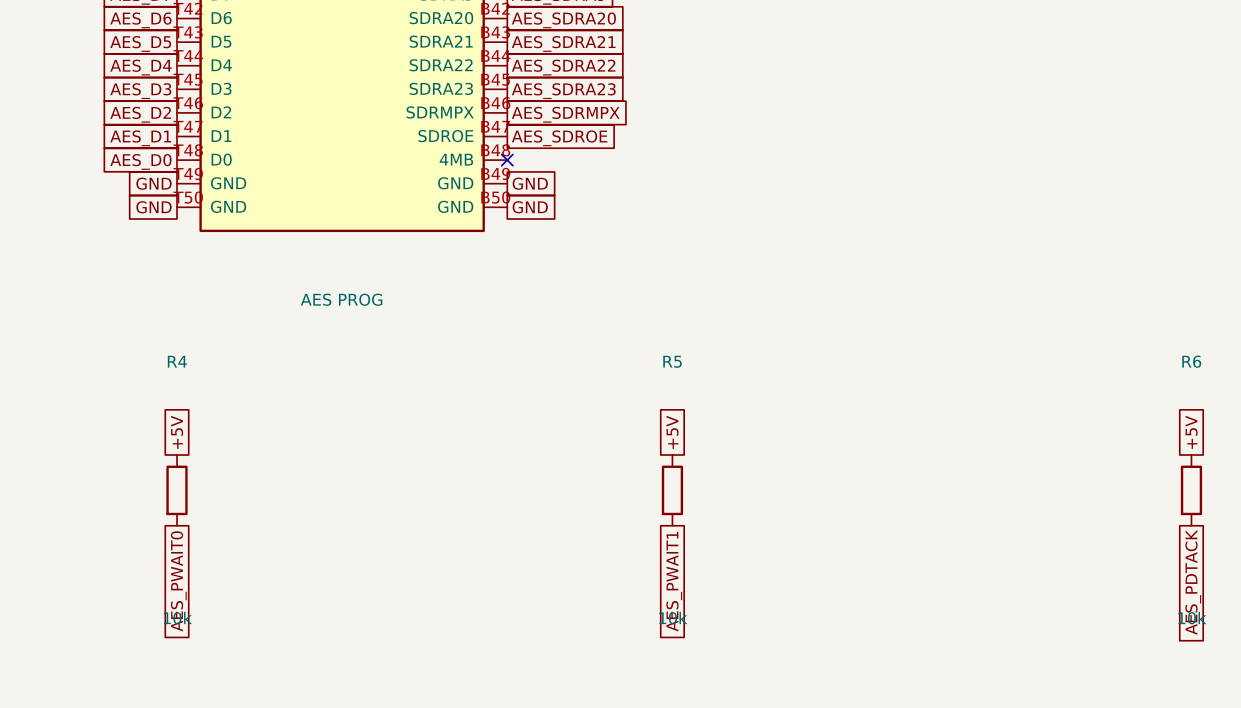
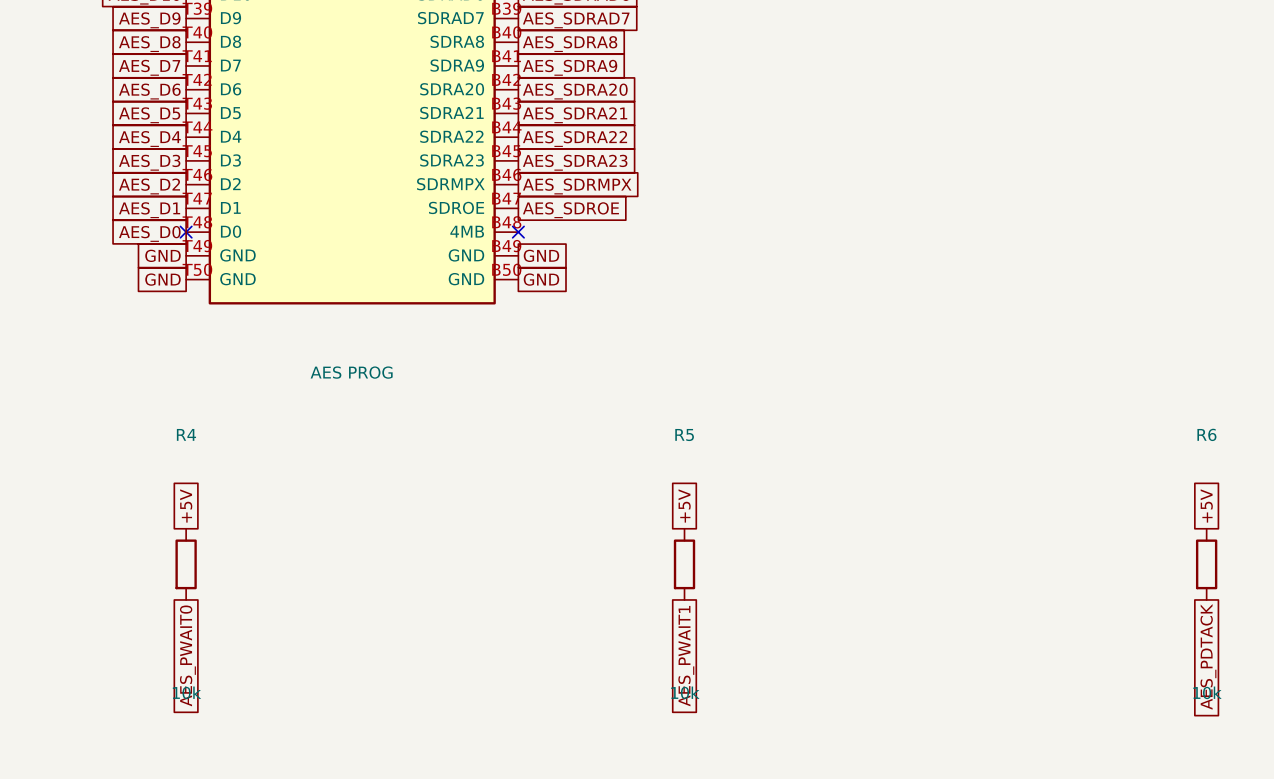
no-connect mark: none -> (186, 232)

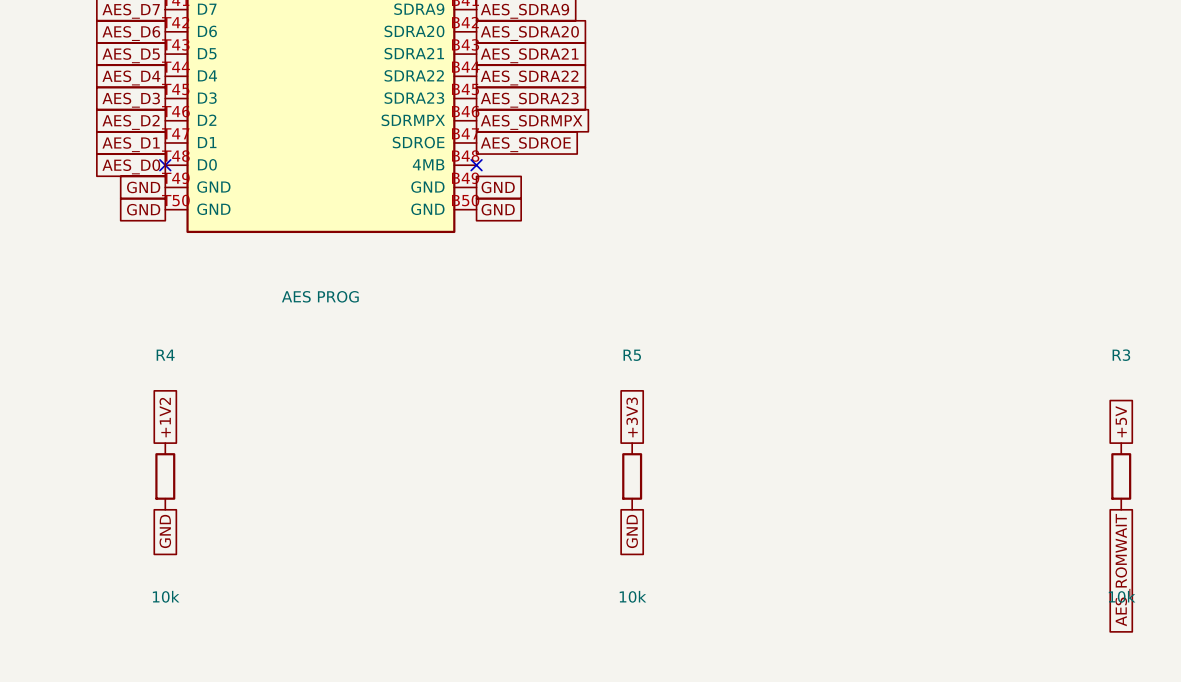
R6 name: R6 (1206, 434) -> R3 (1121, 355)
global label: +5V (186, 505) -> +1V2 (165, 417)
global label: +5V (684, 505) -> +3V3 (632, 417)
global label: AES_PWAIT0 (187, 655) -> GND (165, 531)
global label: AES_PWAIT1 (686, 656) -> GND (632, 531)
global label: AES_PDTACK (1208, 656) -> AES_ROMWAIT (1122, 570)

